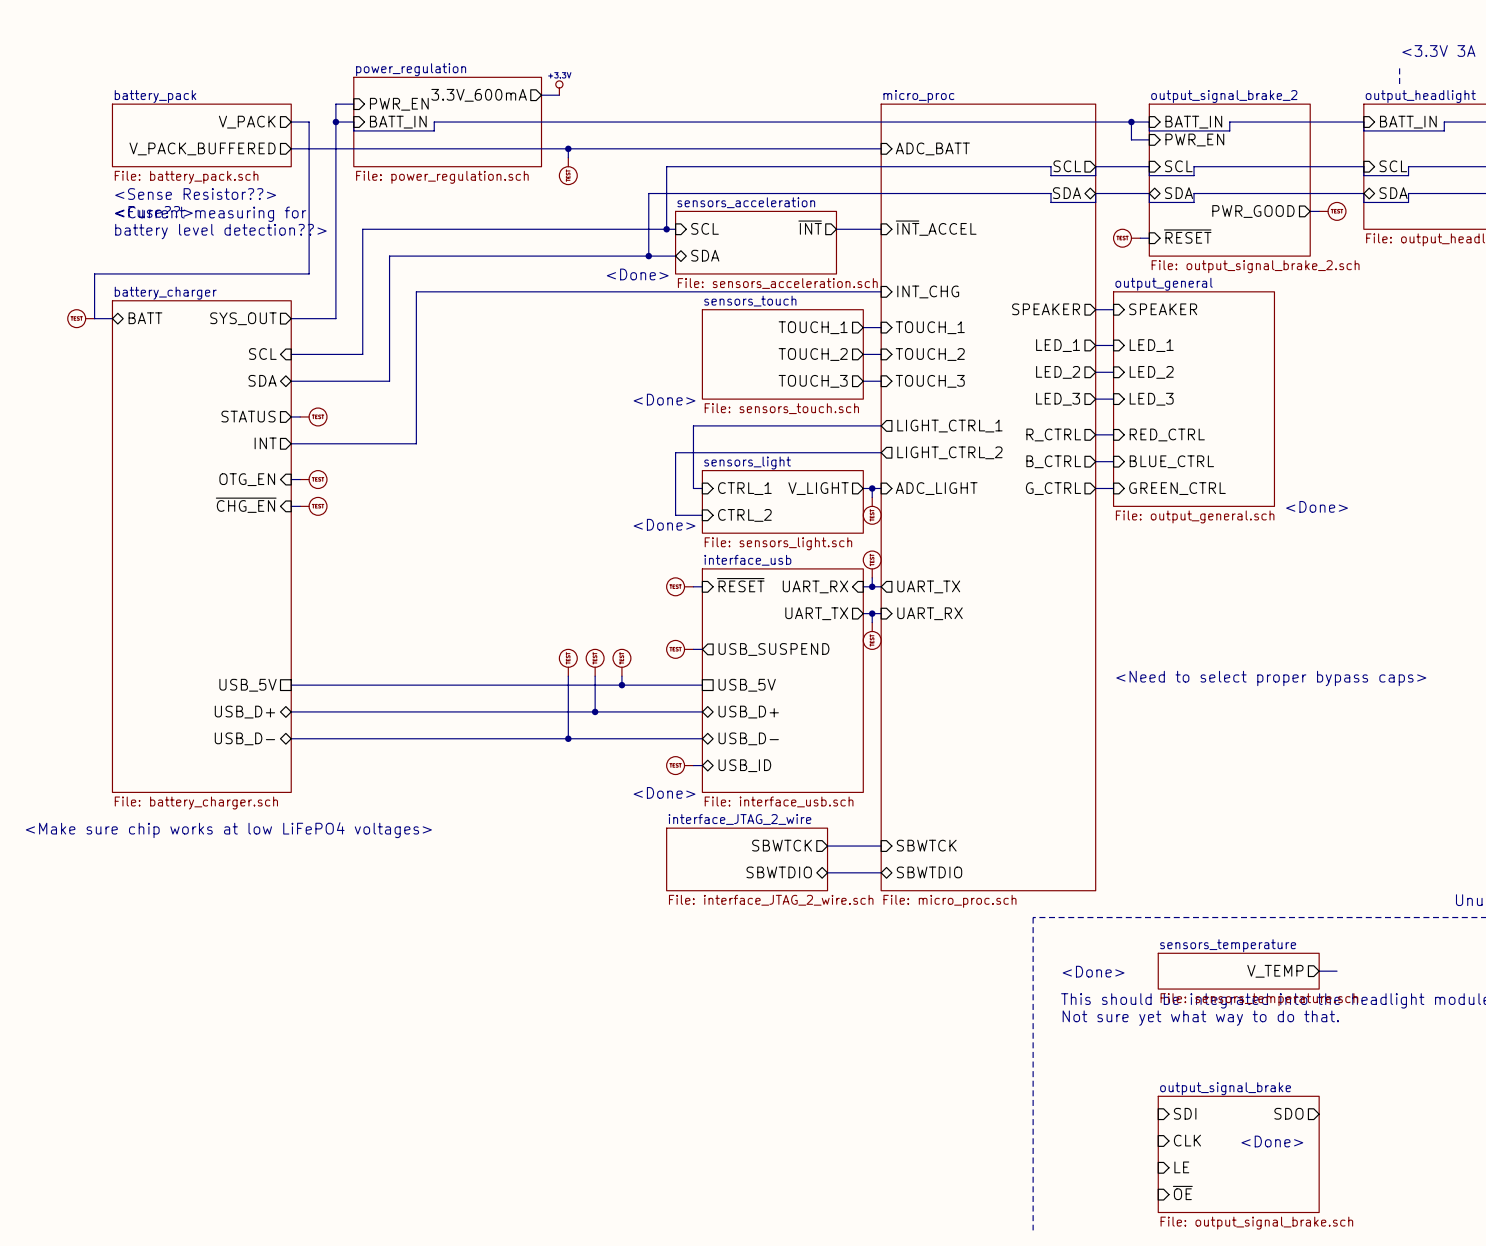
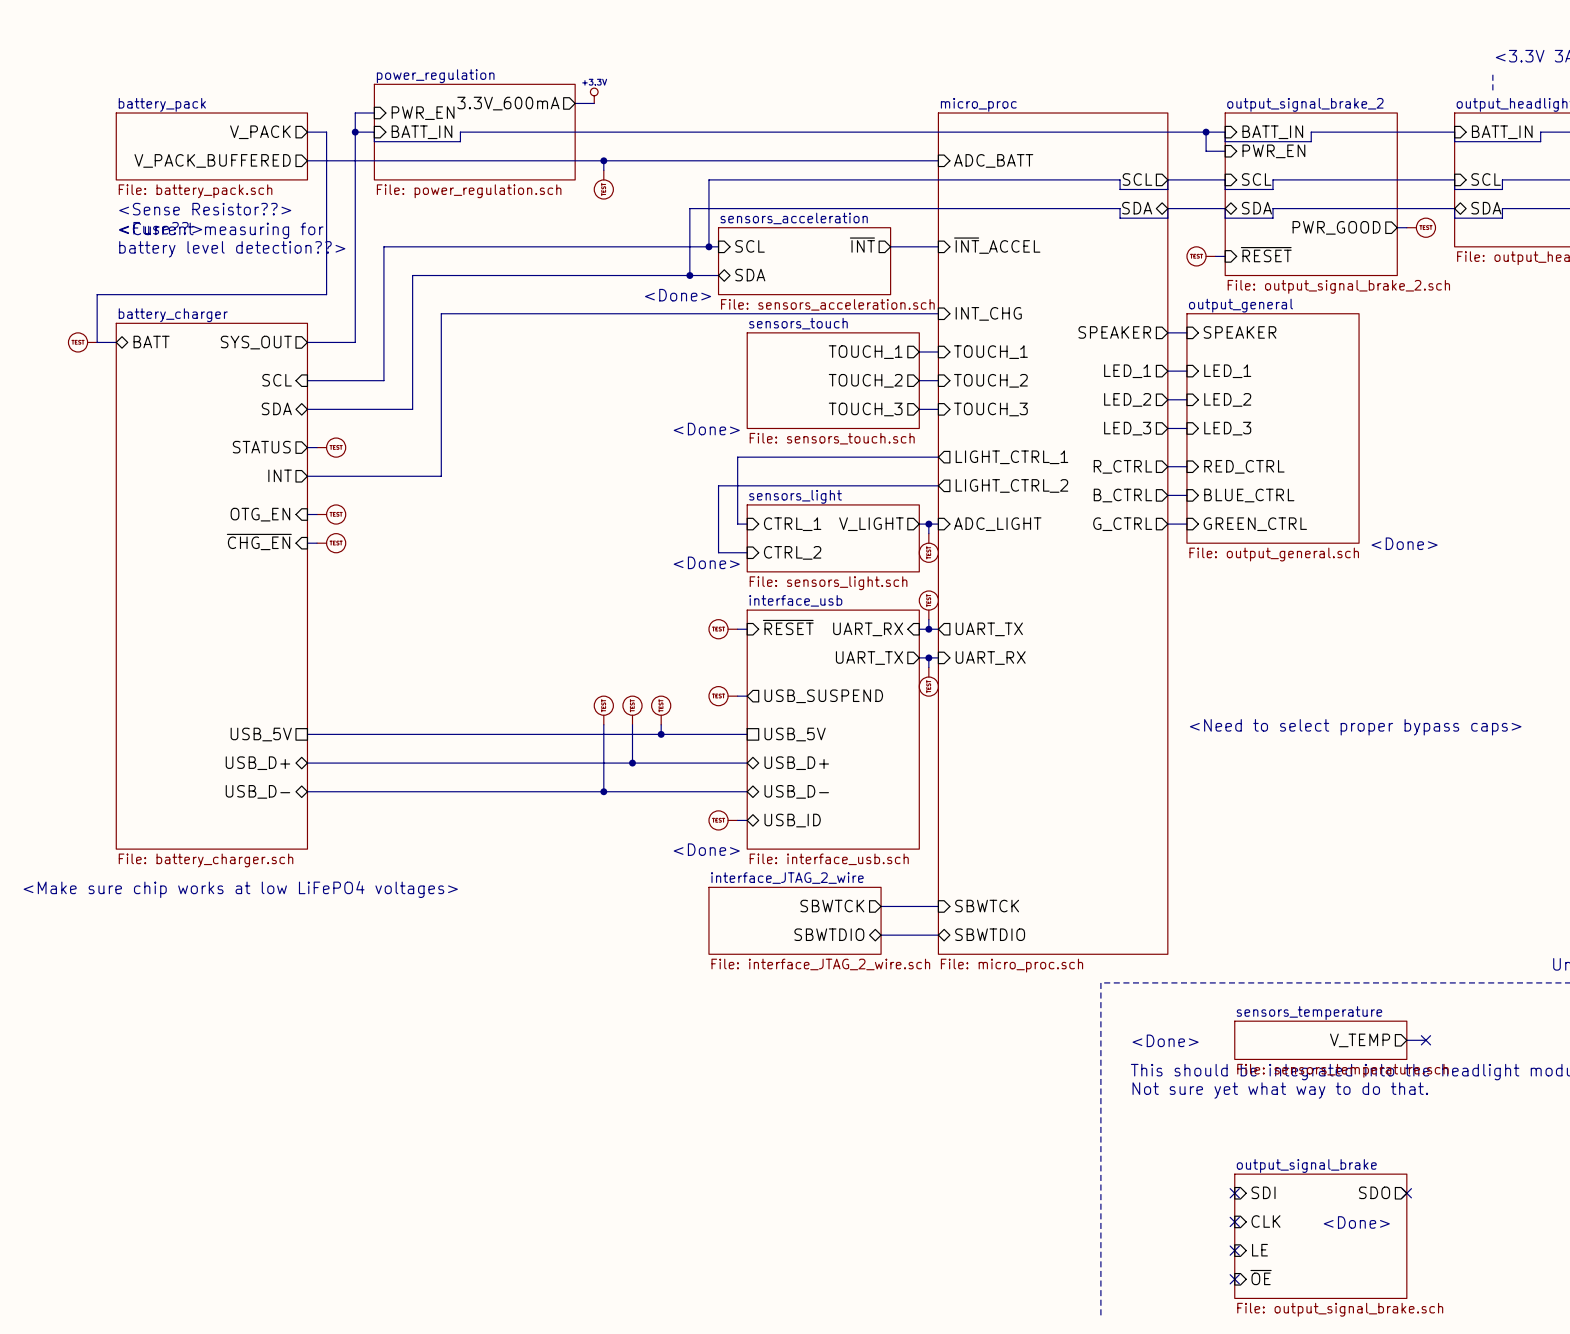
no-connect mark: none -> (1425, 1040)
no-connect mark: none -> (1234, 1193)
no-connect mark: none -> (1406, 1193)
no-connect mark: none -> (1234, 1221)
no-connect mark: none -> (1234, 1250)
no-connect mark: none -> (1234, 1279)

